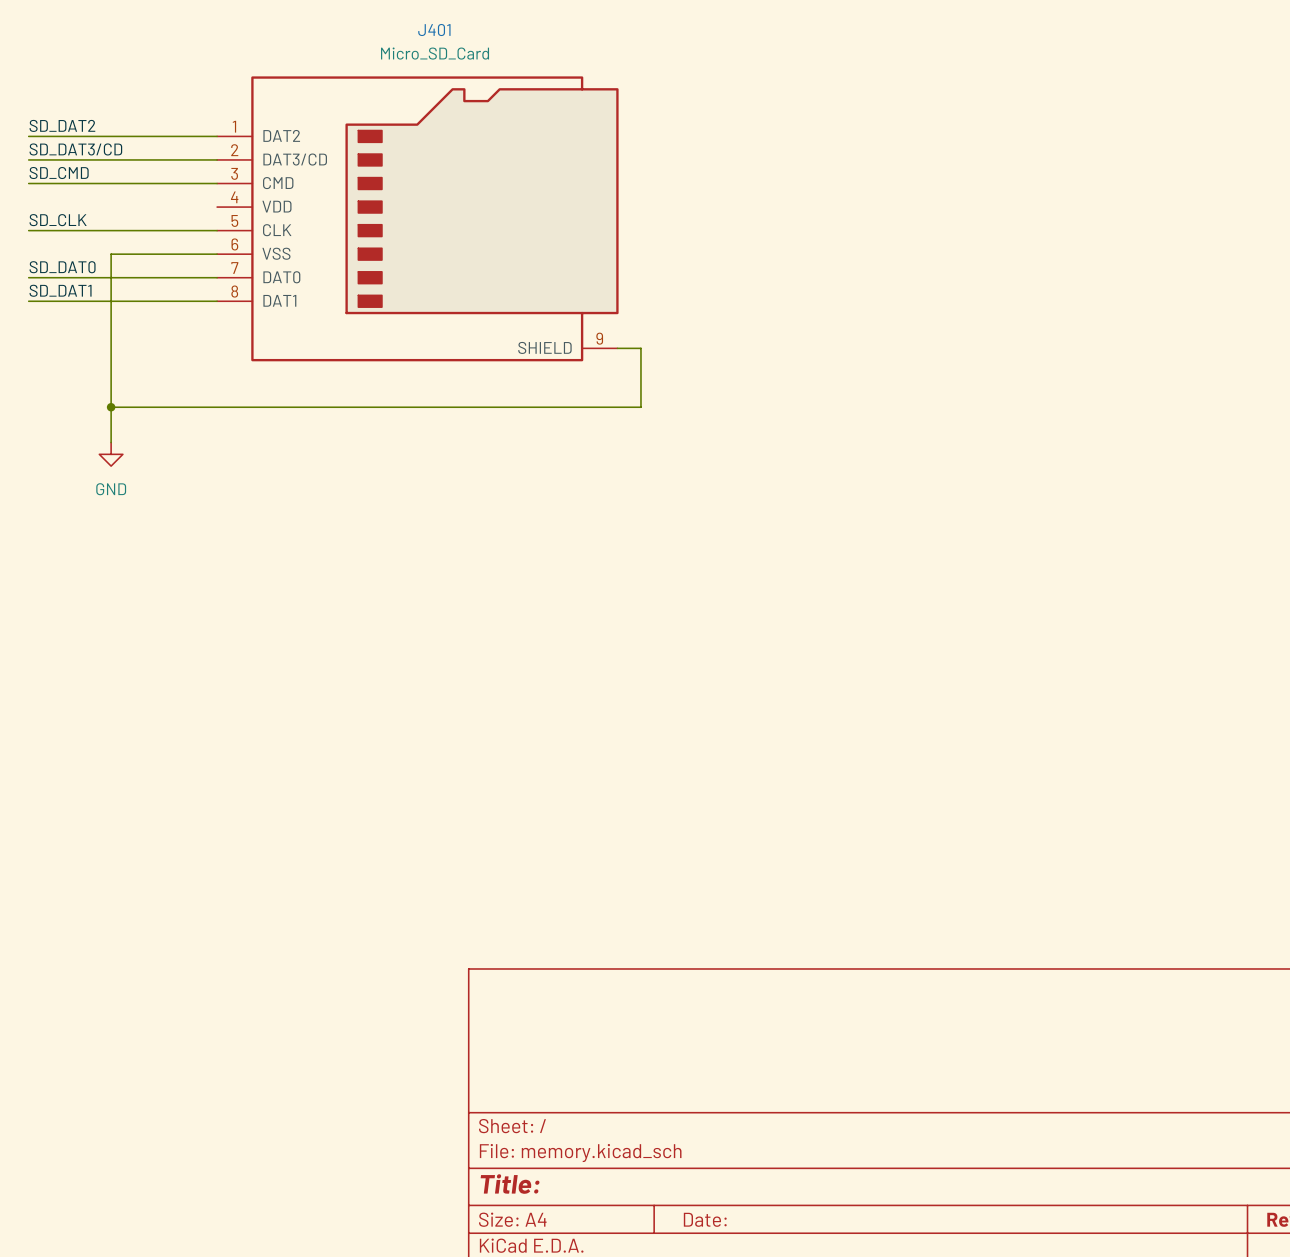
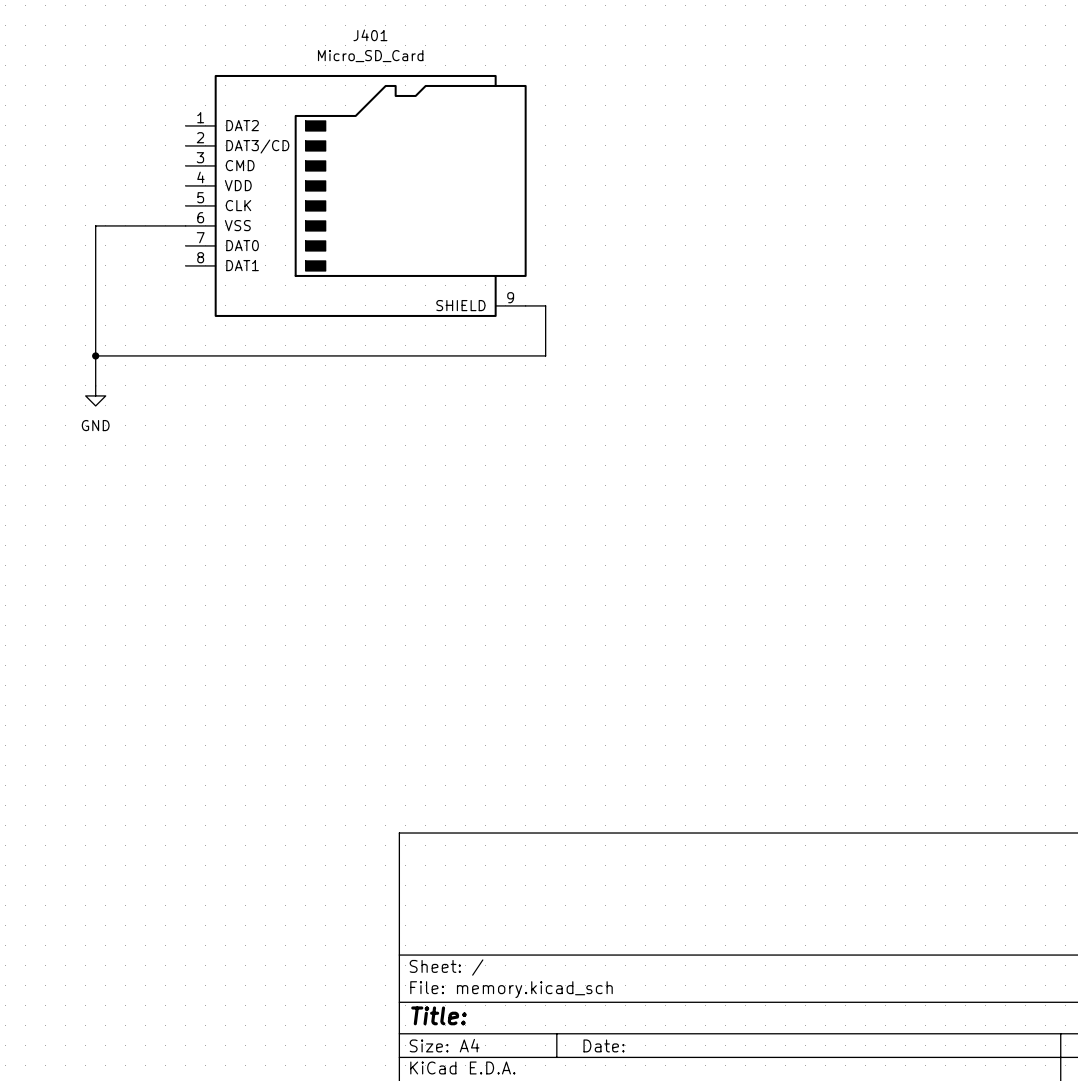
label: SD_DAT2 (62, 125) -> none
wire: (28, 136) (217, 136) -> none
label: SD_DAT3/CD (75, 149) -> none
wire: (28, 159) (217, 159) -> none
label: SD_CMD (59, 173) -> none
wire: (28, 183) (217, 183) -> none
label: SD_CLK (58, 220) -> none
wire: (28, 230) (217, 230) -> none
label: SD_DAT0 (62, 267) -> none
wire: (28, 277) (217, 277) -> none
label: SD_DAT1 (60, 290) -> none
wire: (28, 301) (217, 301) -> none

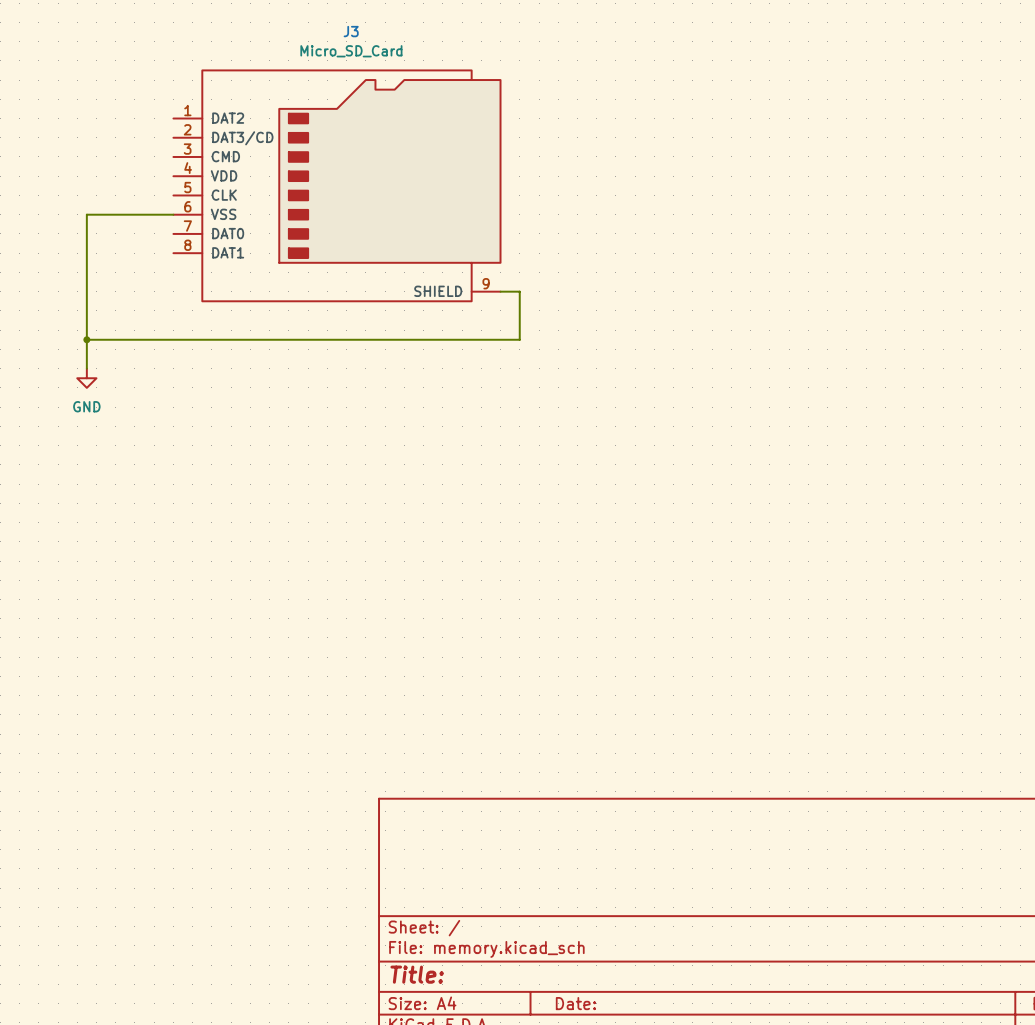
J401 name: J401 (370, 35) -> J3 (351, 31)

